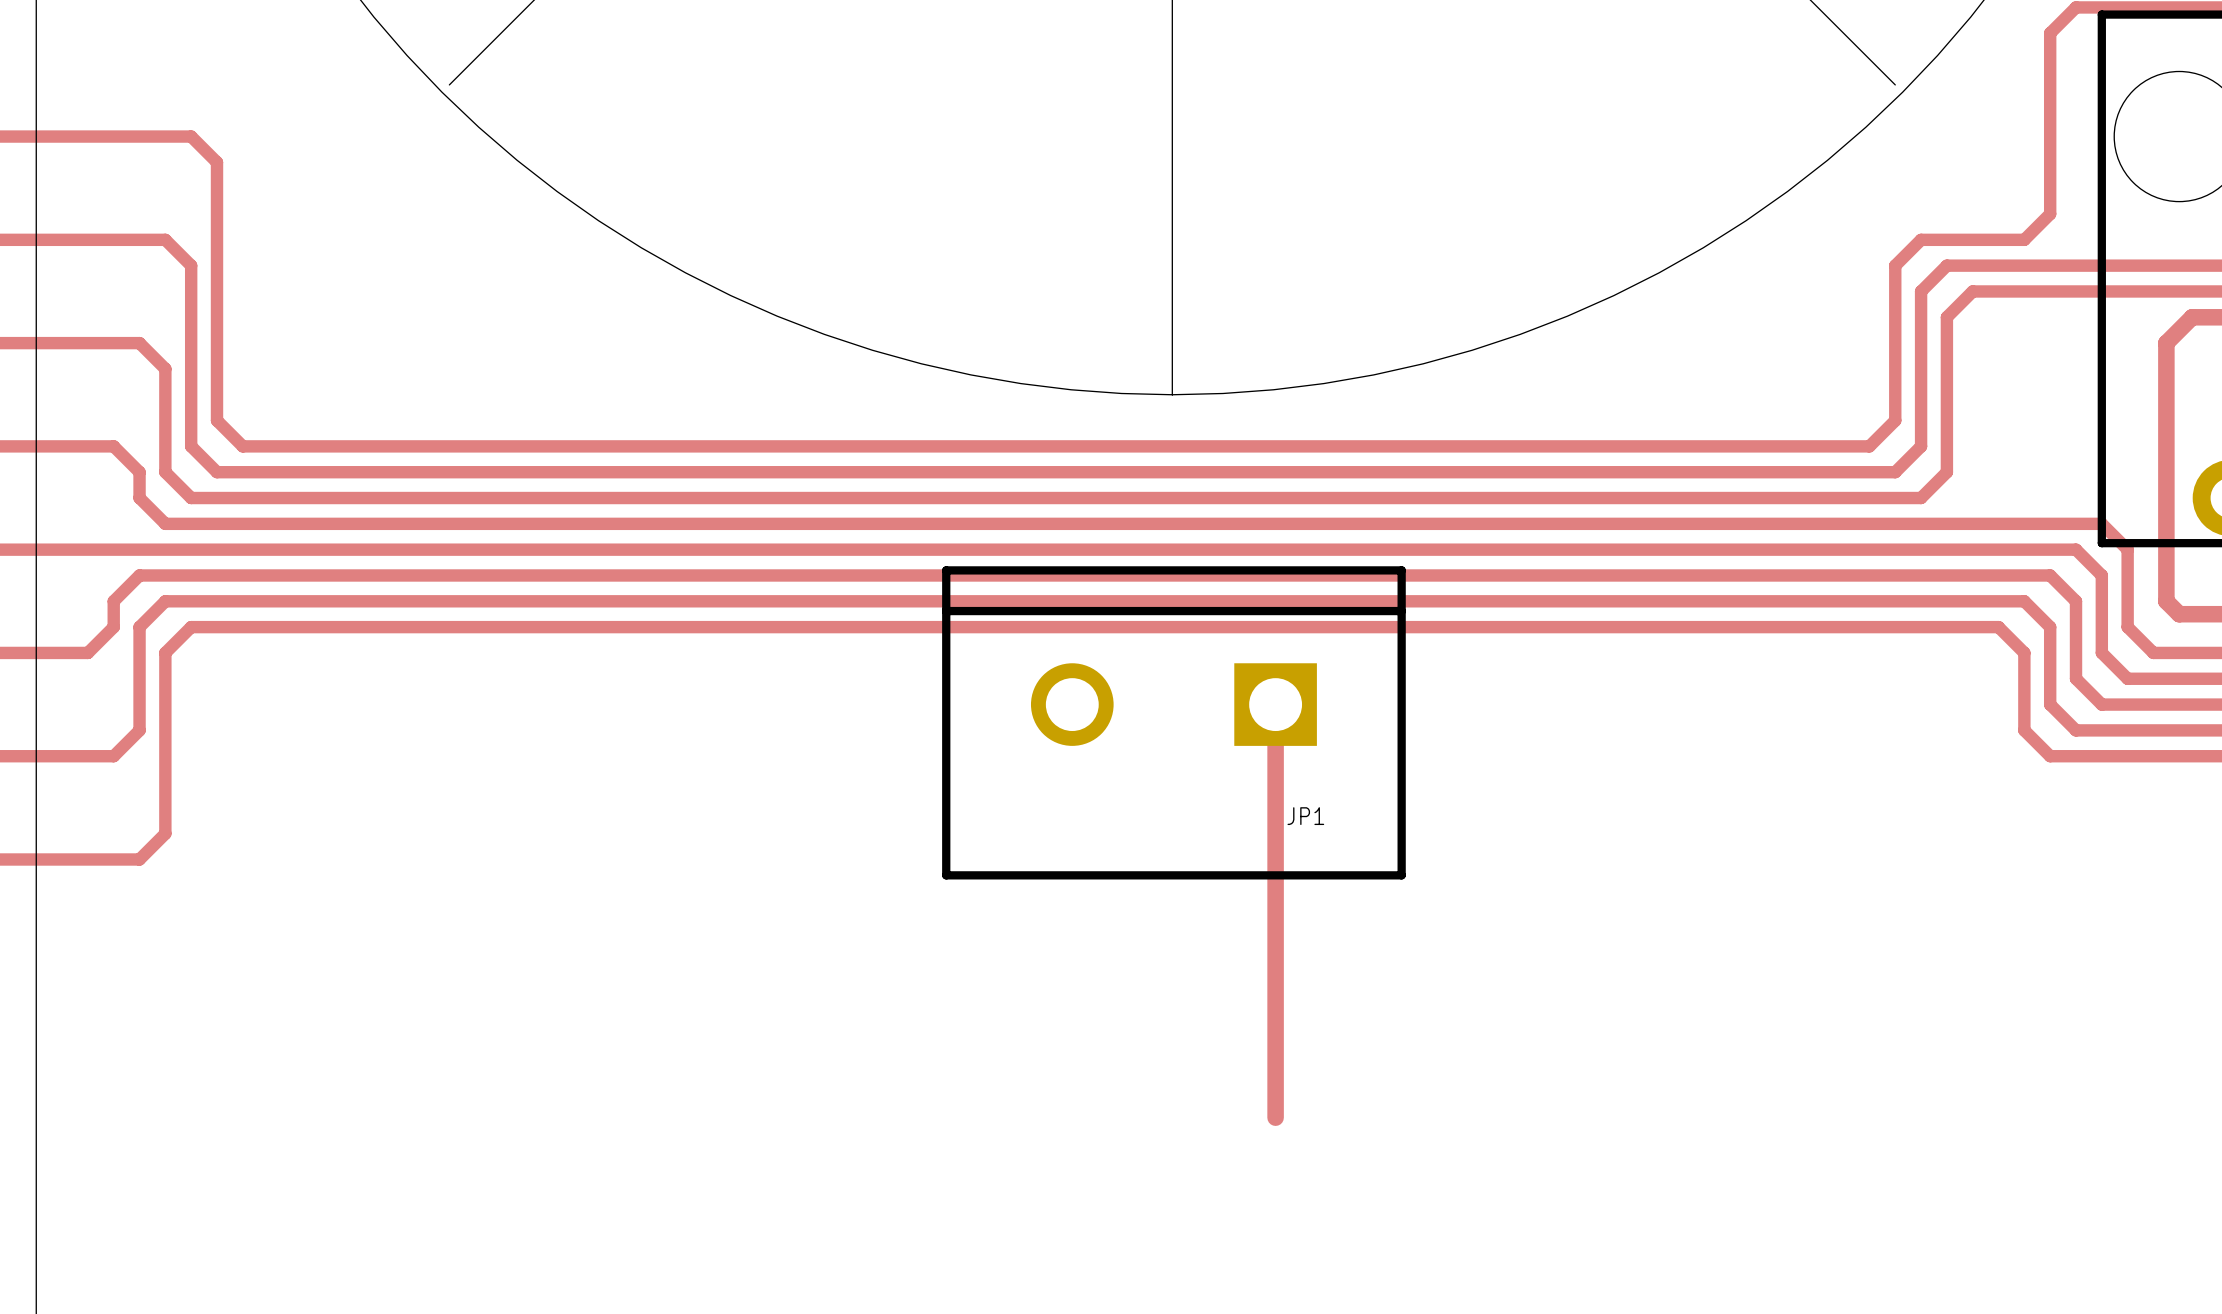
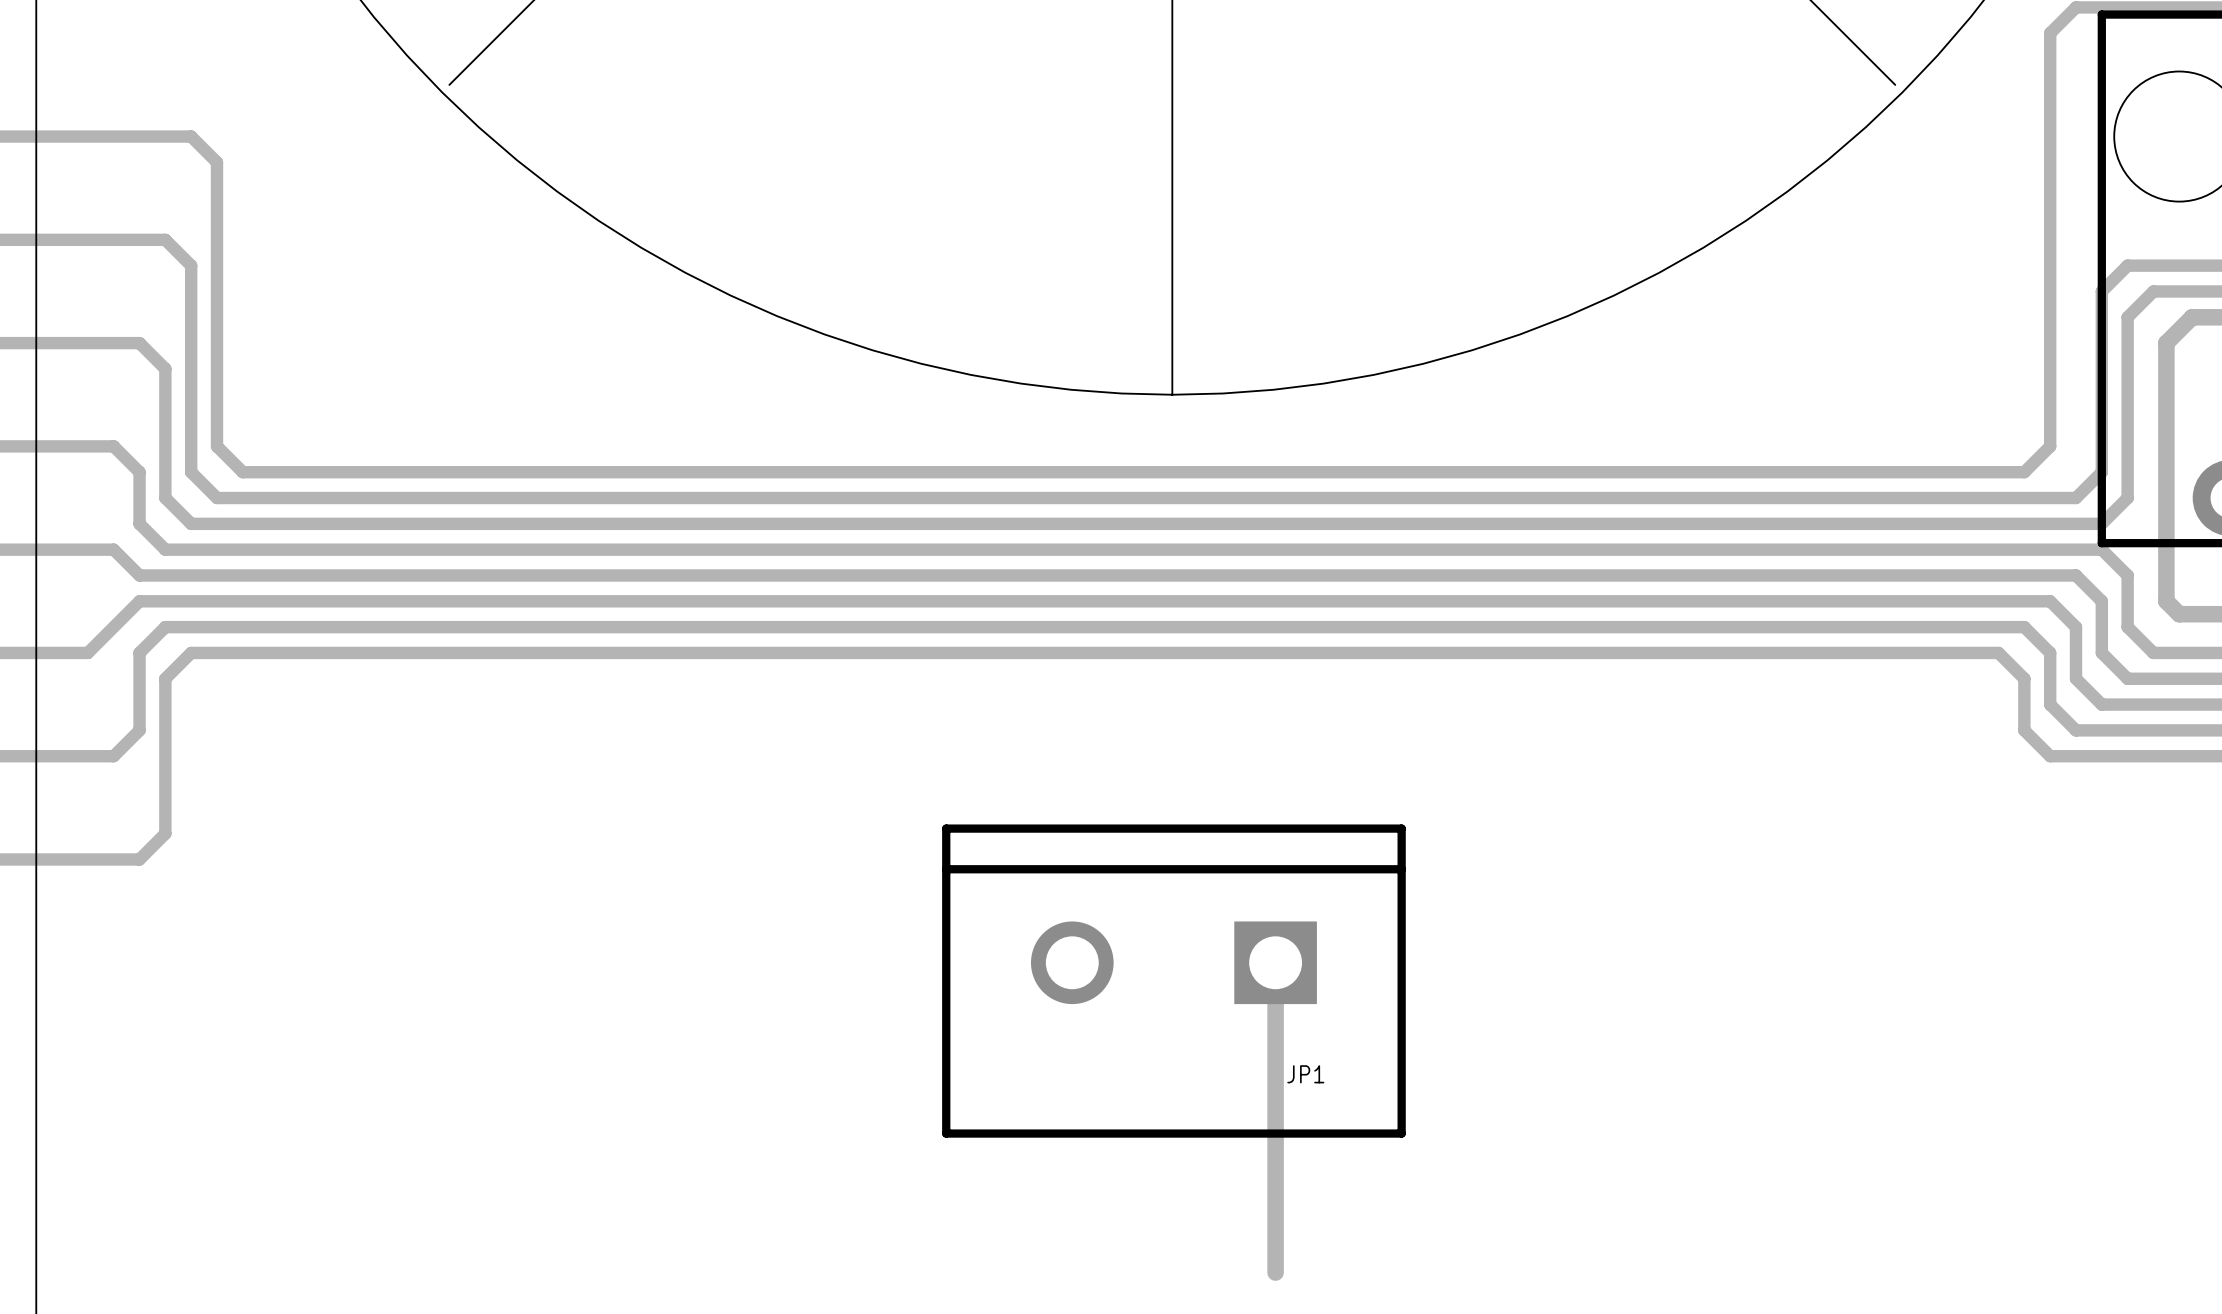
track: (2050, 214) (2024, 239) (1921, 239) (1895, 265) (1895, 420) (1869, 446) (242, 446) (217, 420) -> none
track: (2127, 265) (1946, 265) (1921, 291) (1921, 446) (1895, 472) -> (2050, 214) (2050, 446) (2024, 472) (1895, 472)
track: (2153, 291) (1972, 291) (1946, 317) (1946, 472) (1921, 498) -> (2127, 265) (2101, 291) (2101, 472) (2076, 498) (1921, 498)
track: none -> (2153, 291) (2127, 317) (2127, 498) (2101, 523)
track: (191, 446) (217, 472) (242, 472) -> (217, 420) (217, 446) (242, 472)
track: none -> (191, 446) (191, 472) (217, 498)
track: (165, 472) (191, 498) (217, 498) -> (165, 472) (165, 498) (191, 523)
track: (139, 498) (165, 523) (191, 523) -> (139, 498) (139, 523) (165, 549)
track: (2101, 523) (2127, 549) (2127, 575) -> (2076, 549) (2101, 549) (2127, 575)
track: (113, 549) (165, 549) -> (113, 549) (139, 575)
track: (2076, 549) (2101, 575) (2101, 601) -> none
track: (139, 575) (113, 601) (113, 627) -> (165, 601) (139, 601) (113, 627)
track: (2050, 575) (2076, 601) (2076, 627) -> (2050, 575) (2076, 575) (2101, 601)
track: (165, 601) (139, 627) (139, 652) -> (191, 627) (165, 627) (139, 652)
track: (2024, 601) (2050, 627) (2050, 652) -> (1998, 627) (2024, 627) (2050, 652)
track: none -> (2024, 601) (2050, 601) (2076, 627)
track: (191, 627) (165, 652) (165, 678) -> (2024, 678) (1998, 652) (191, 652) (165, 678)
track: (1998, 627) (2024, 652) (2024, 678) -> none
track: (1275, 704) (1275, 962) -> none
JP1 position: (1173, 722) -> (1173, 981)
track: none -> (1275, 1117) (1275, 1272)

